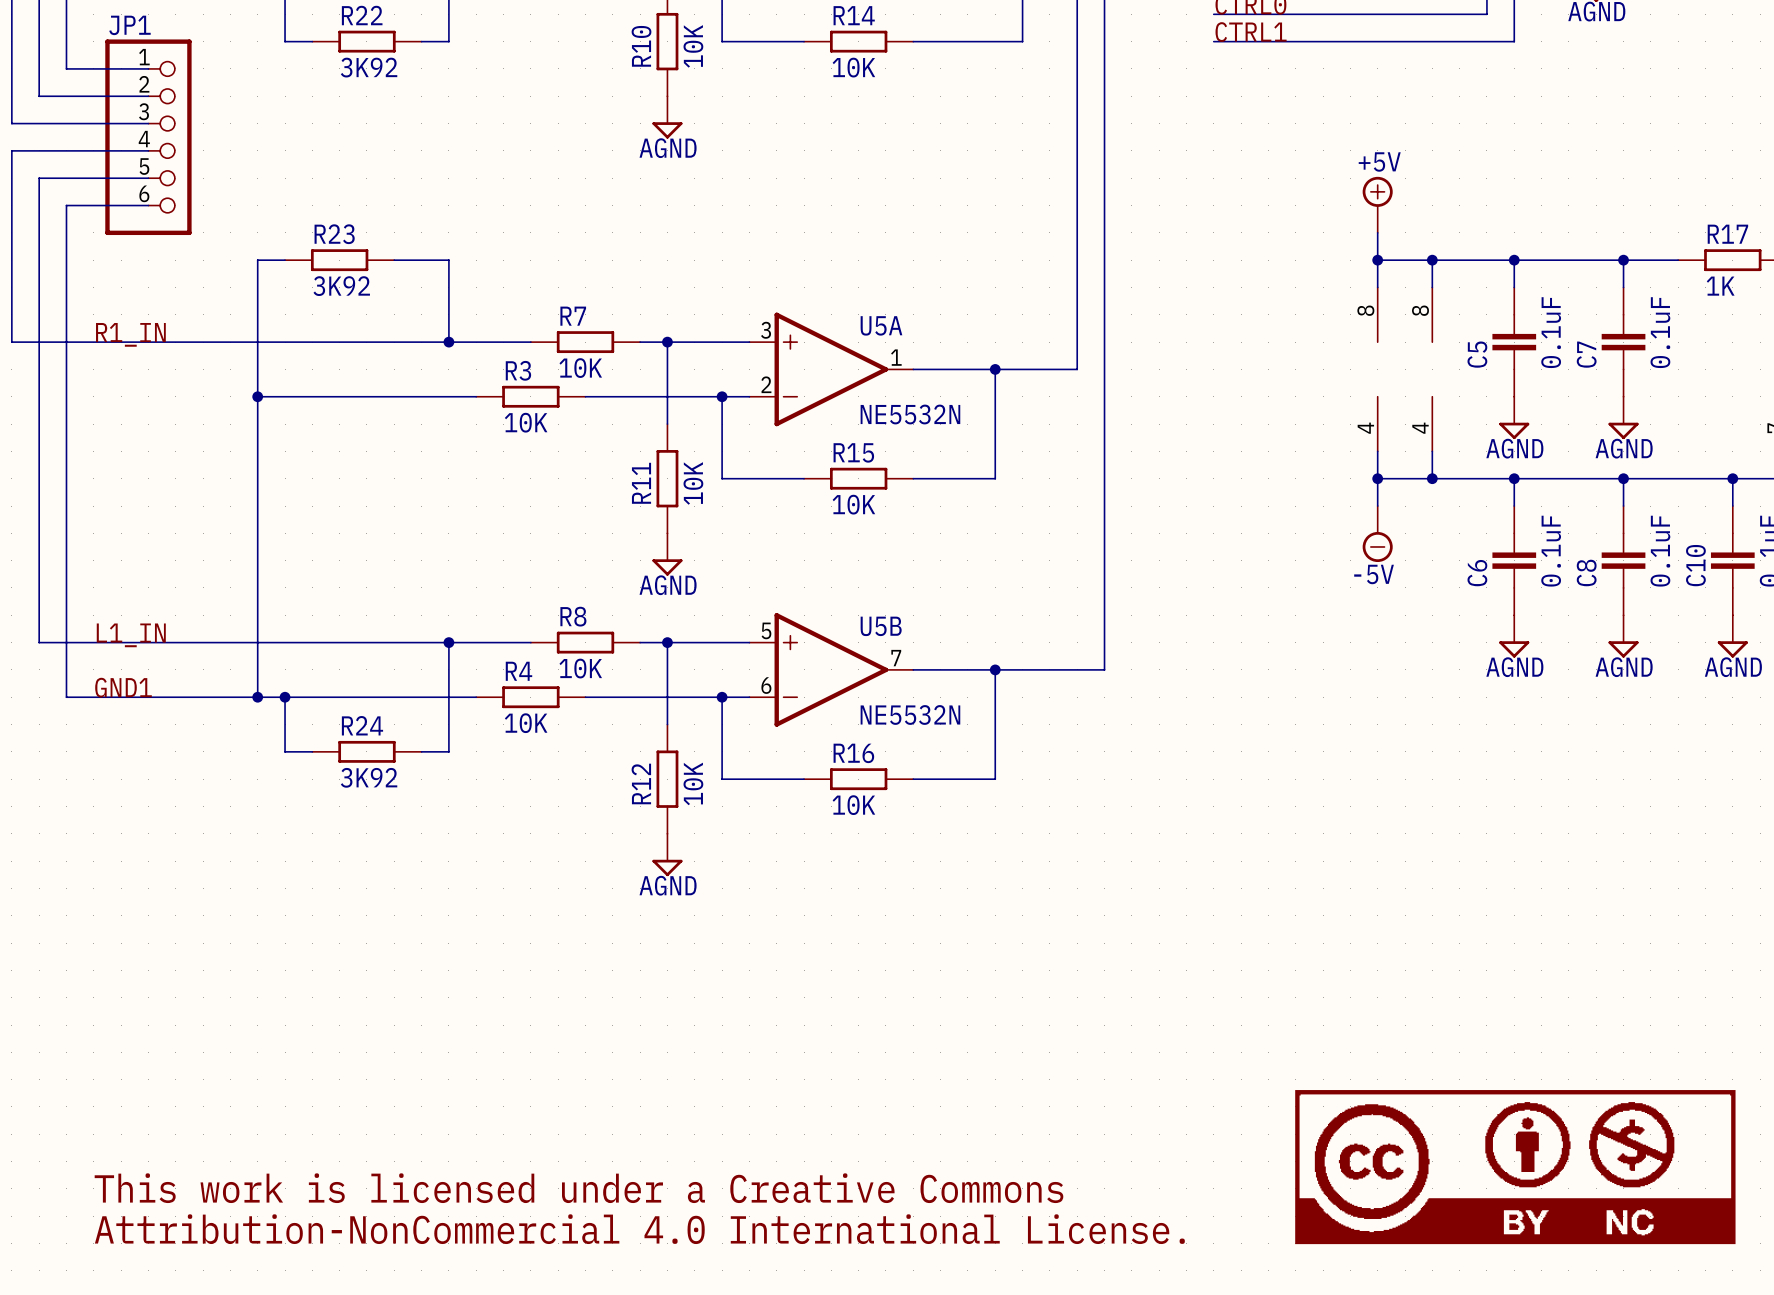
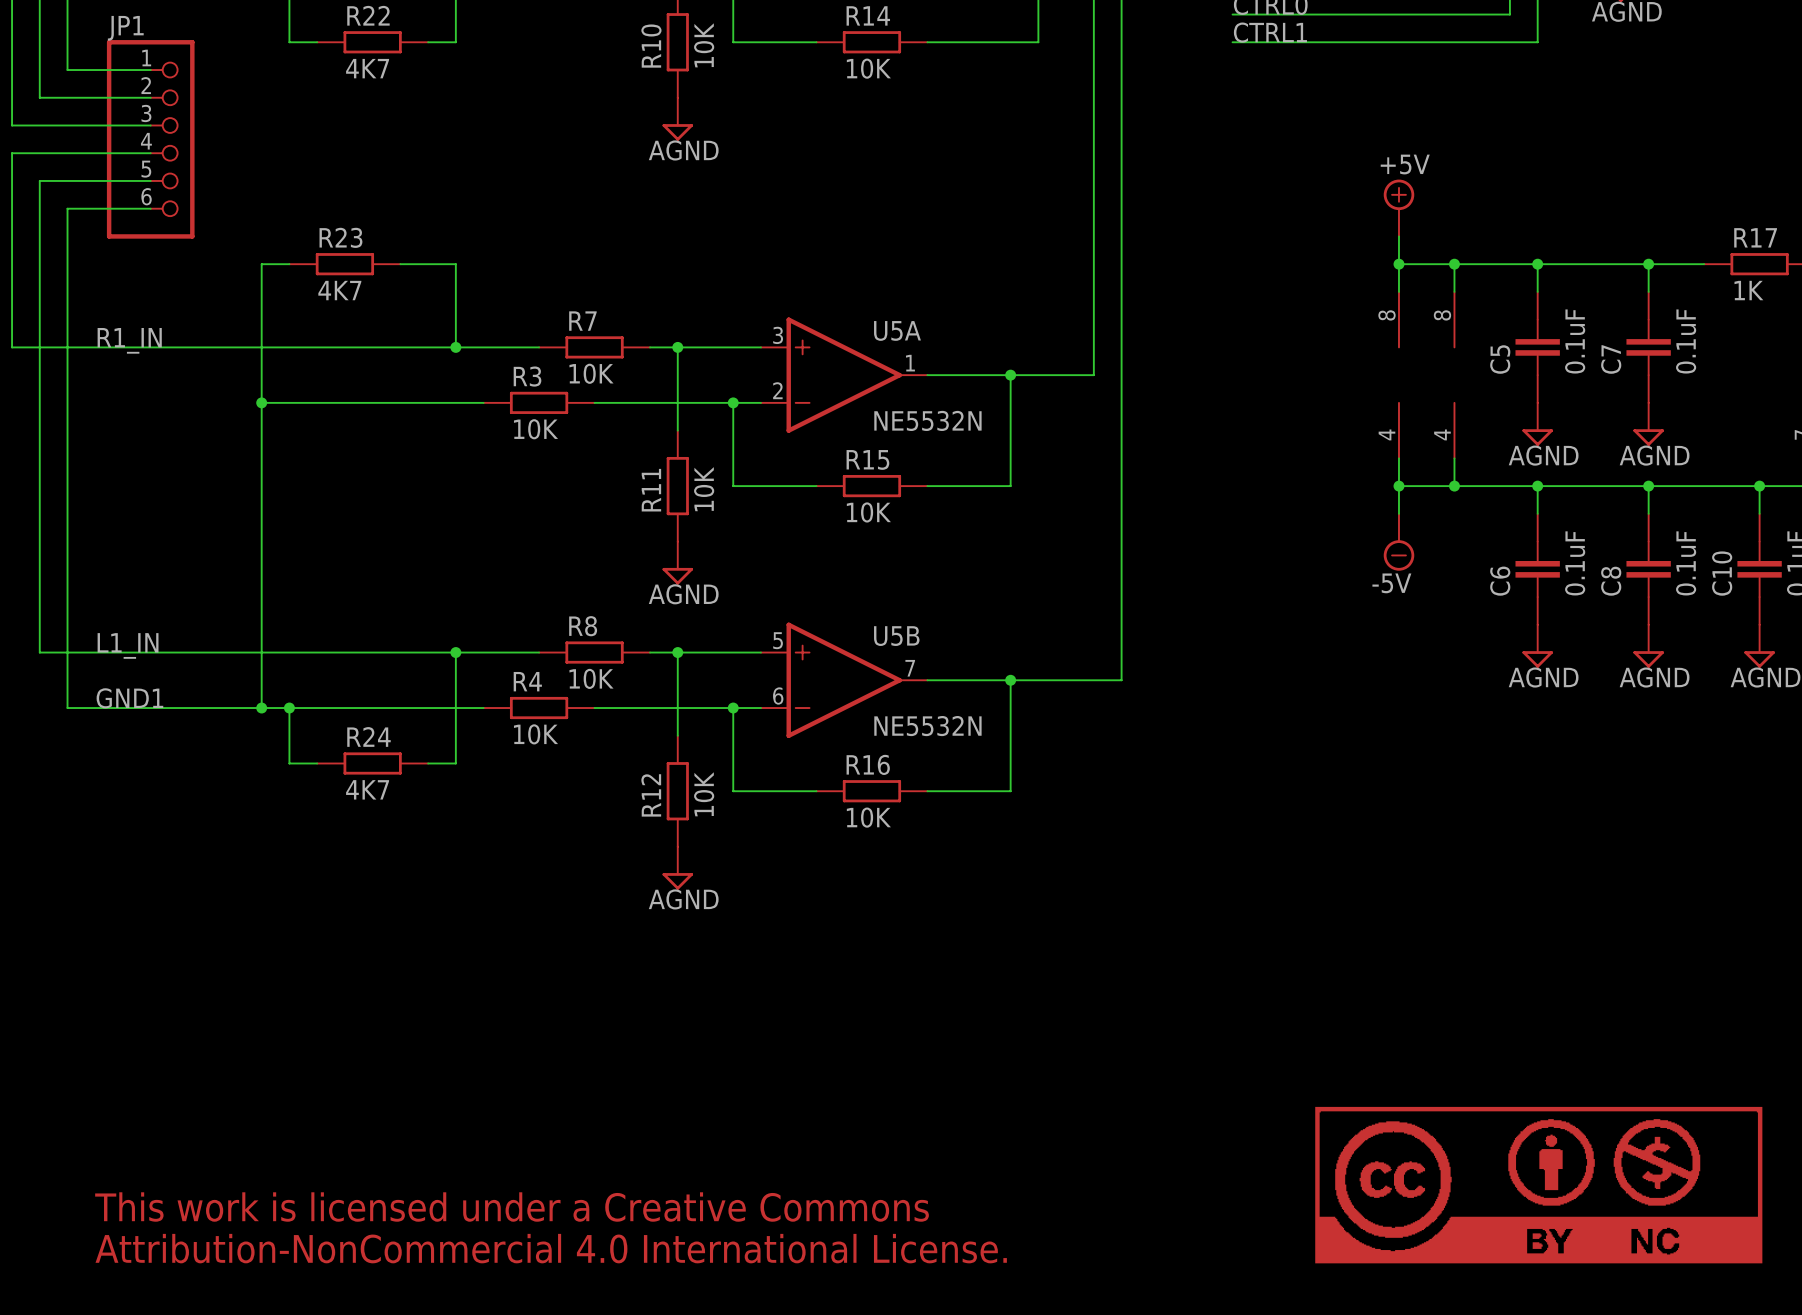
R22 value: 3K92 (369, 67) -> 4K7 (367, 68)
R23 value: 3K92 (341, 286) -> 4K7 (339, 290)
R24 value: 3K92 (369, 777) -> 4K7 (367, 789)

